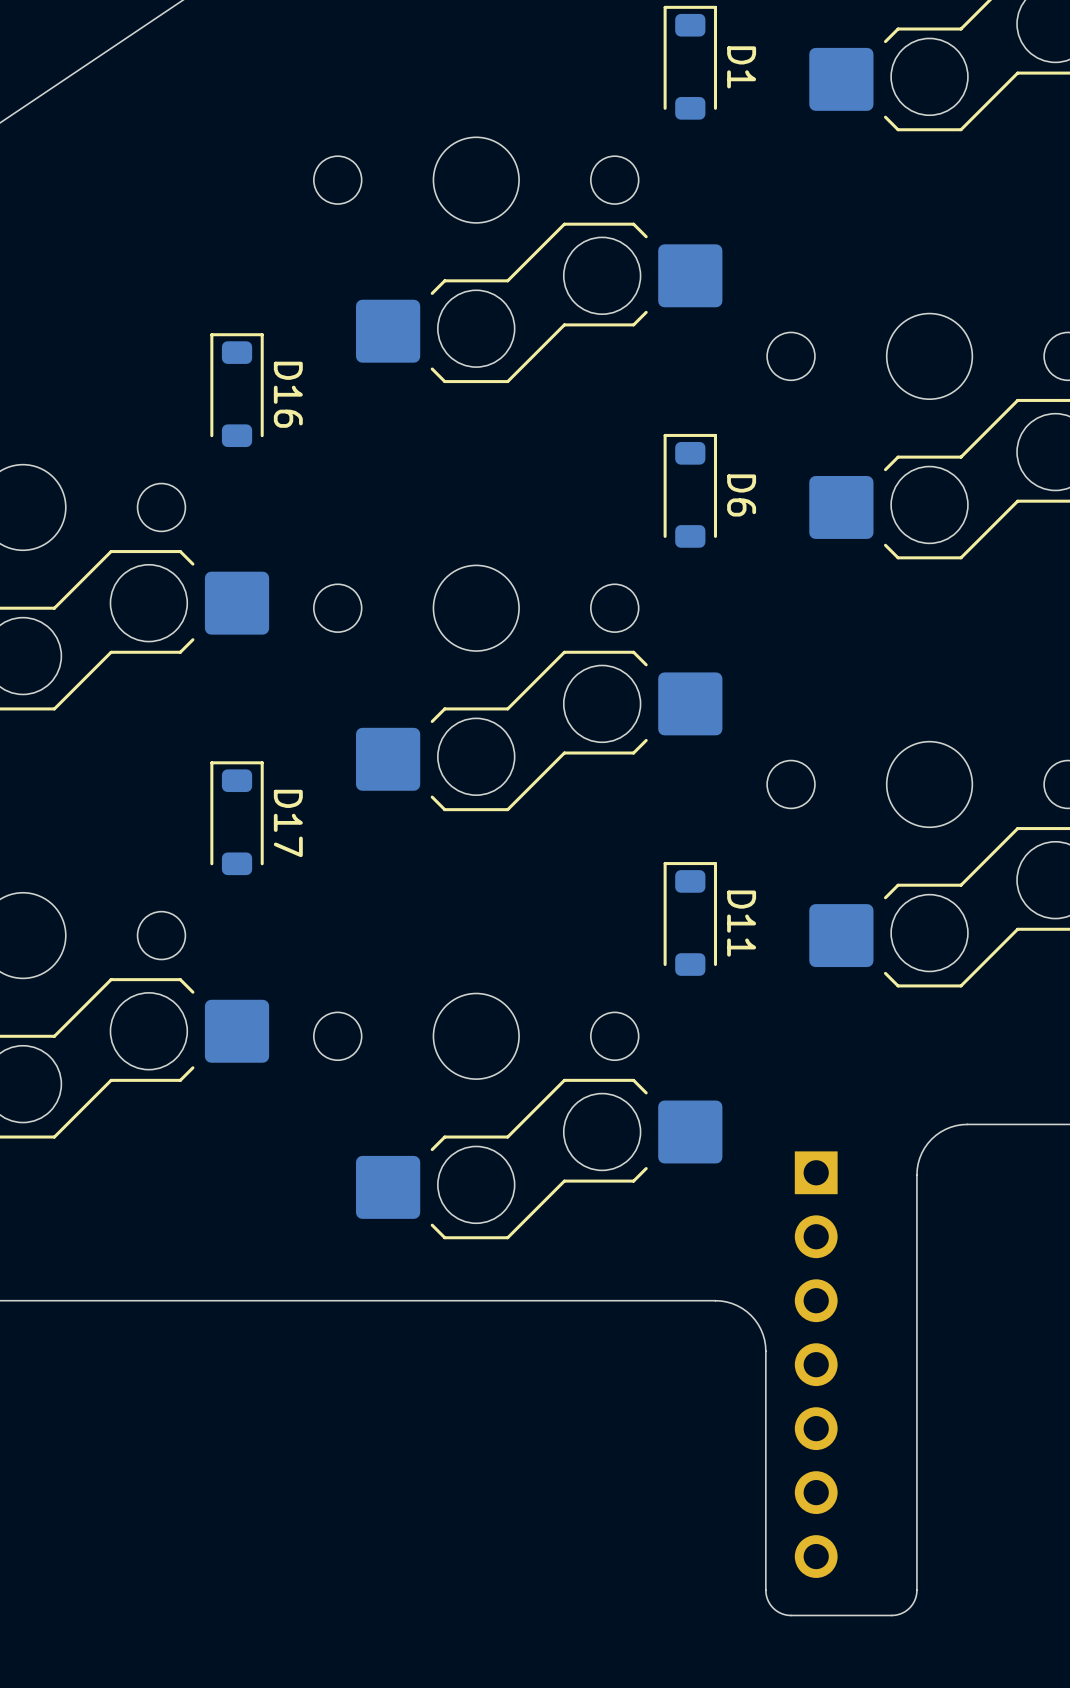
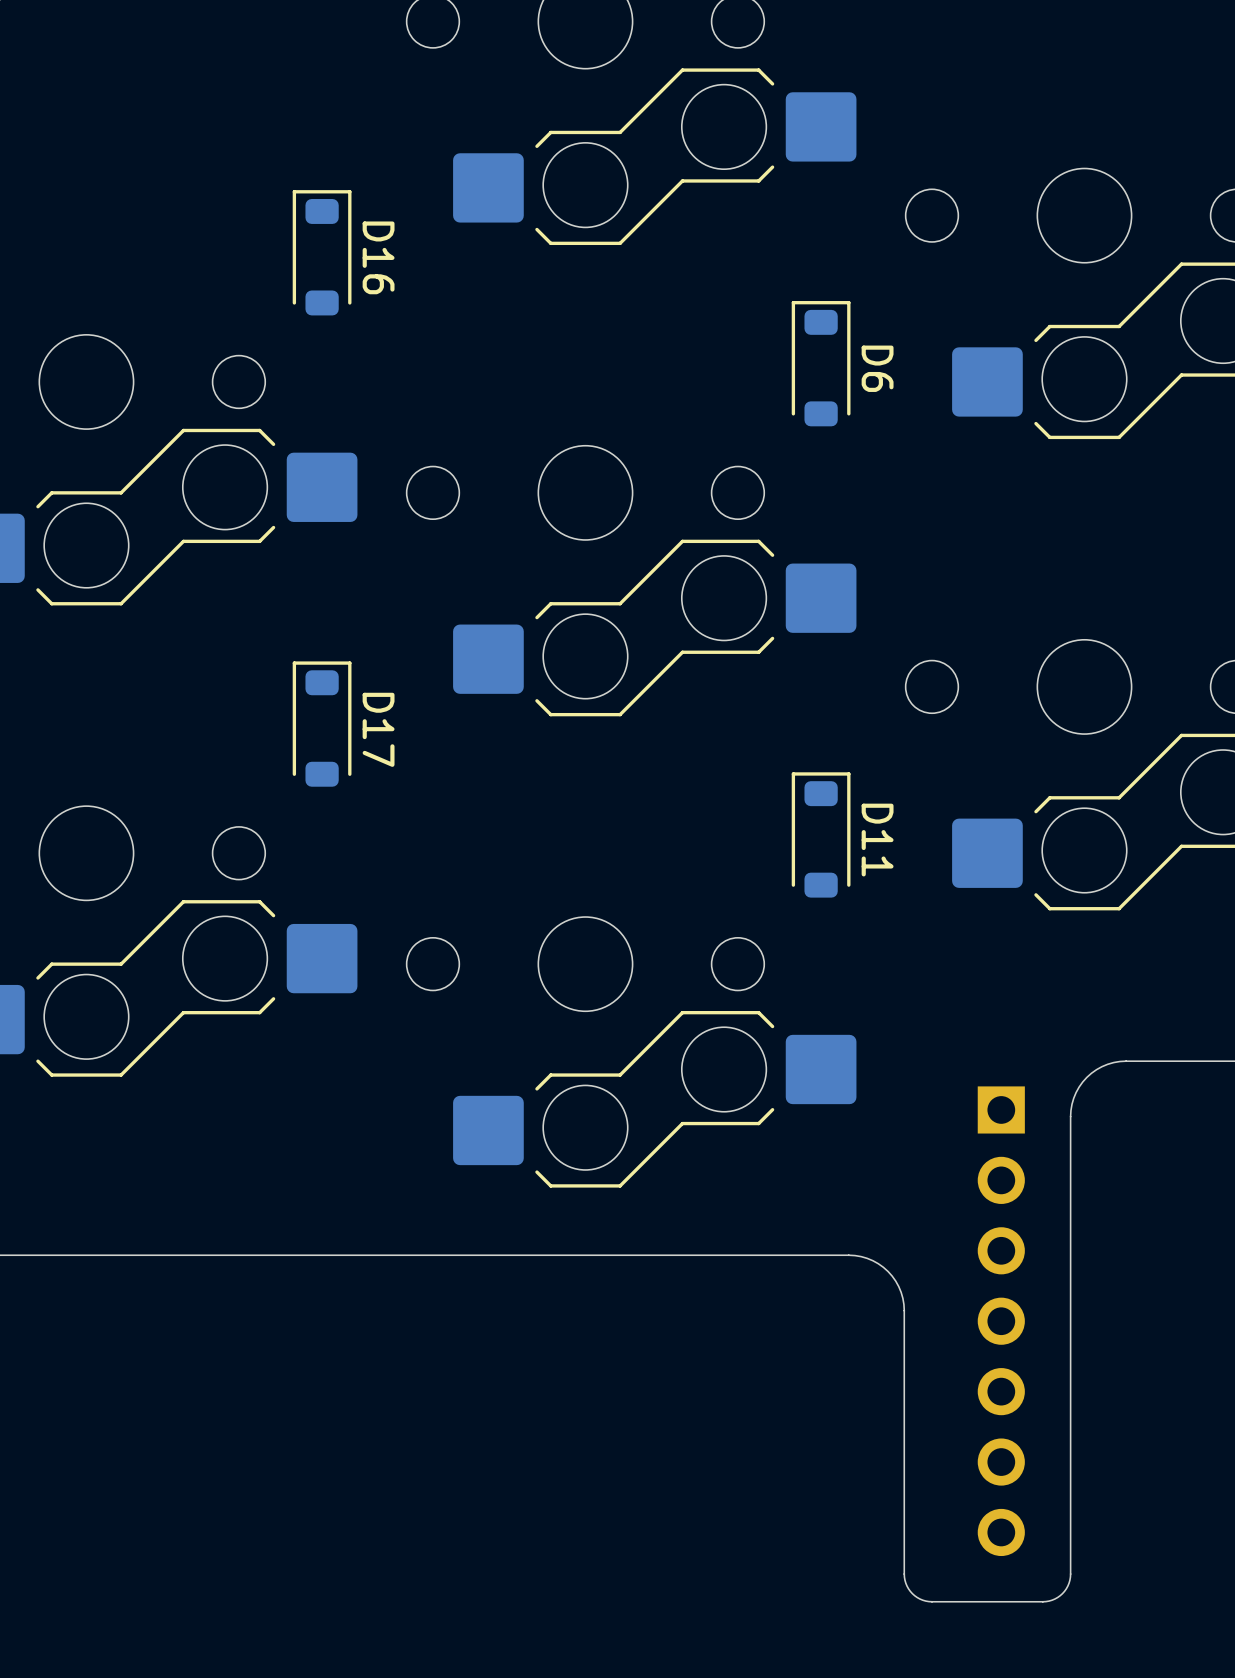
part position: (816, 1364) -> (1001, 1321)

